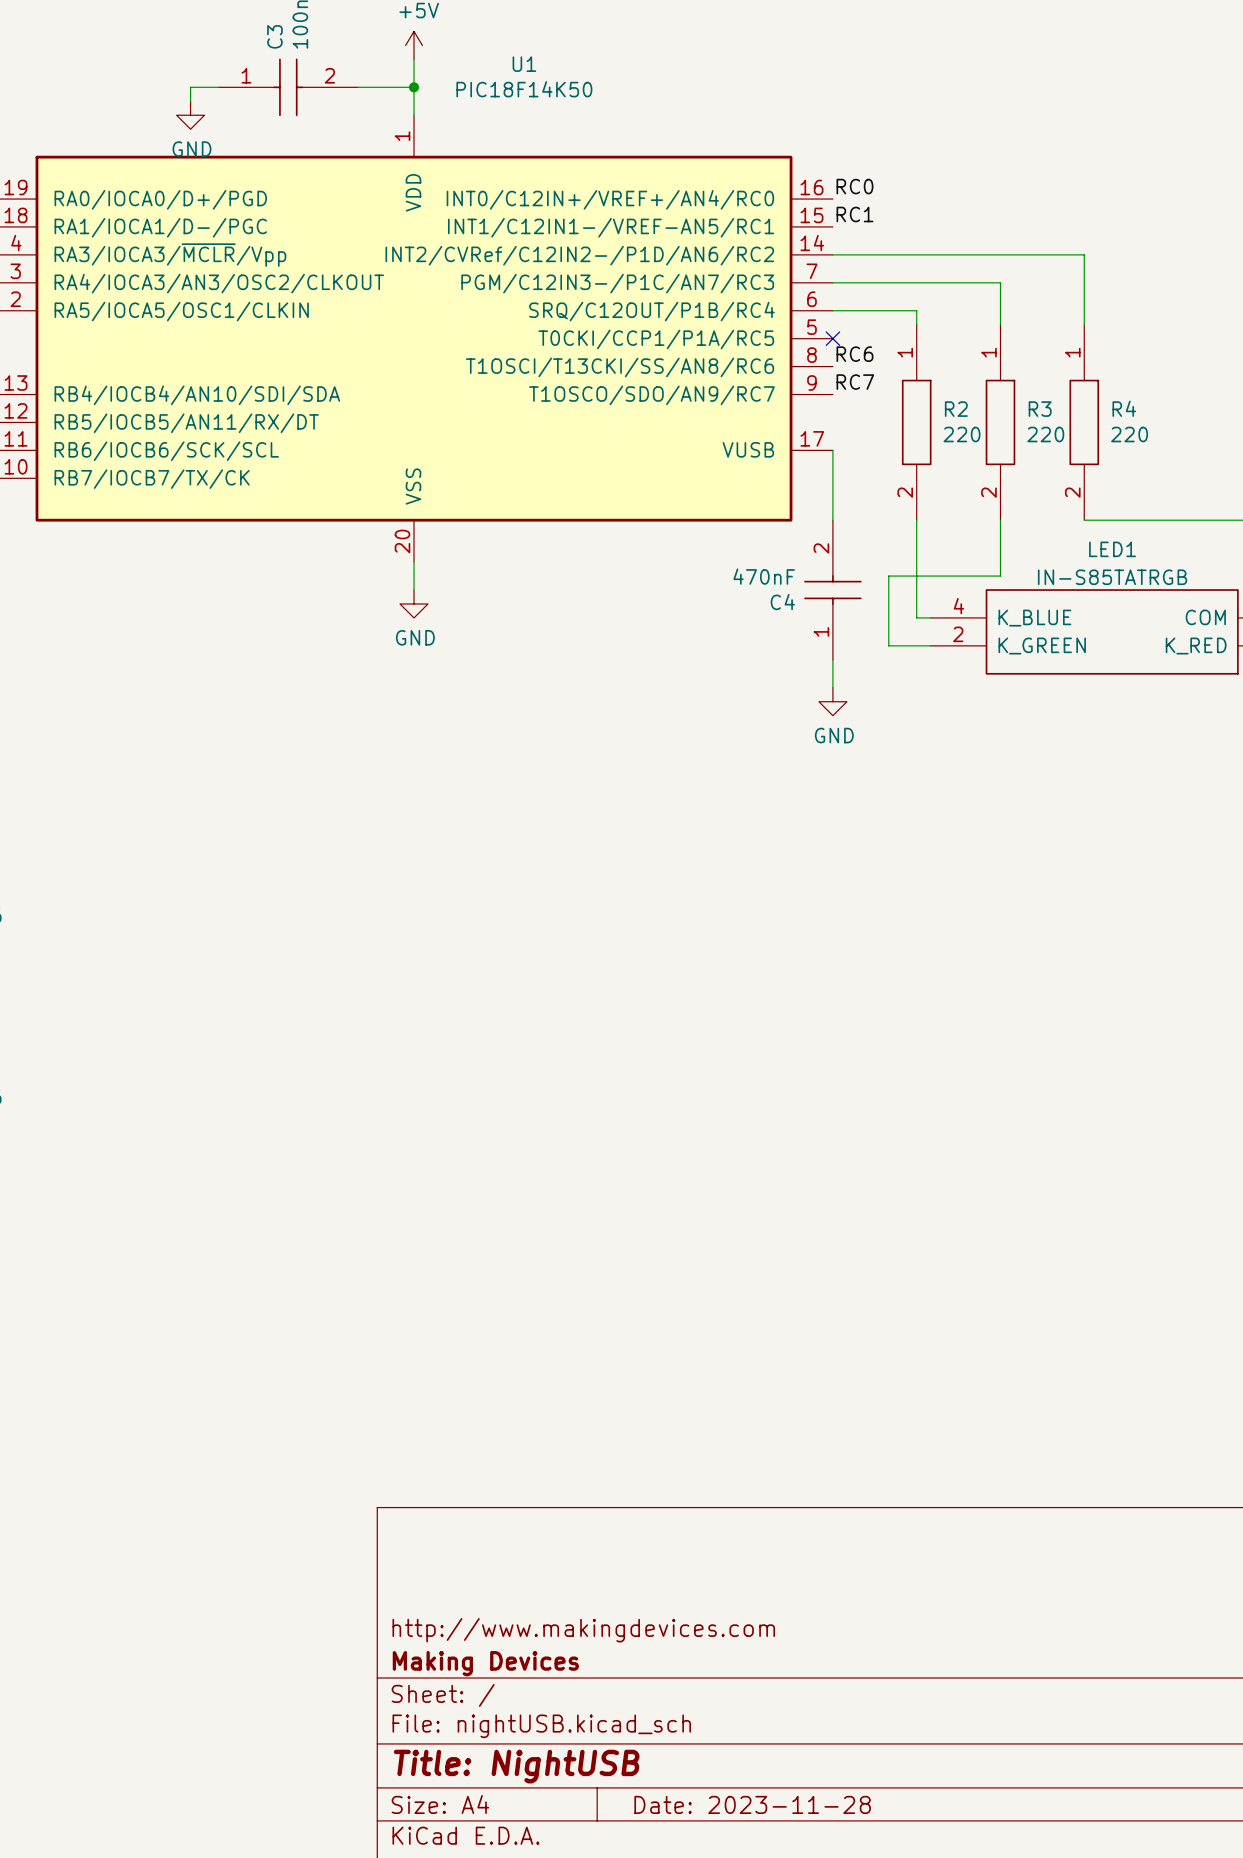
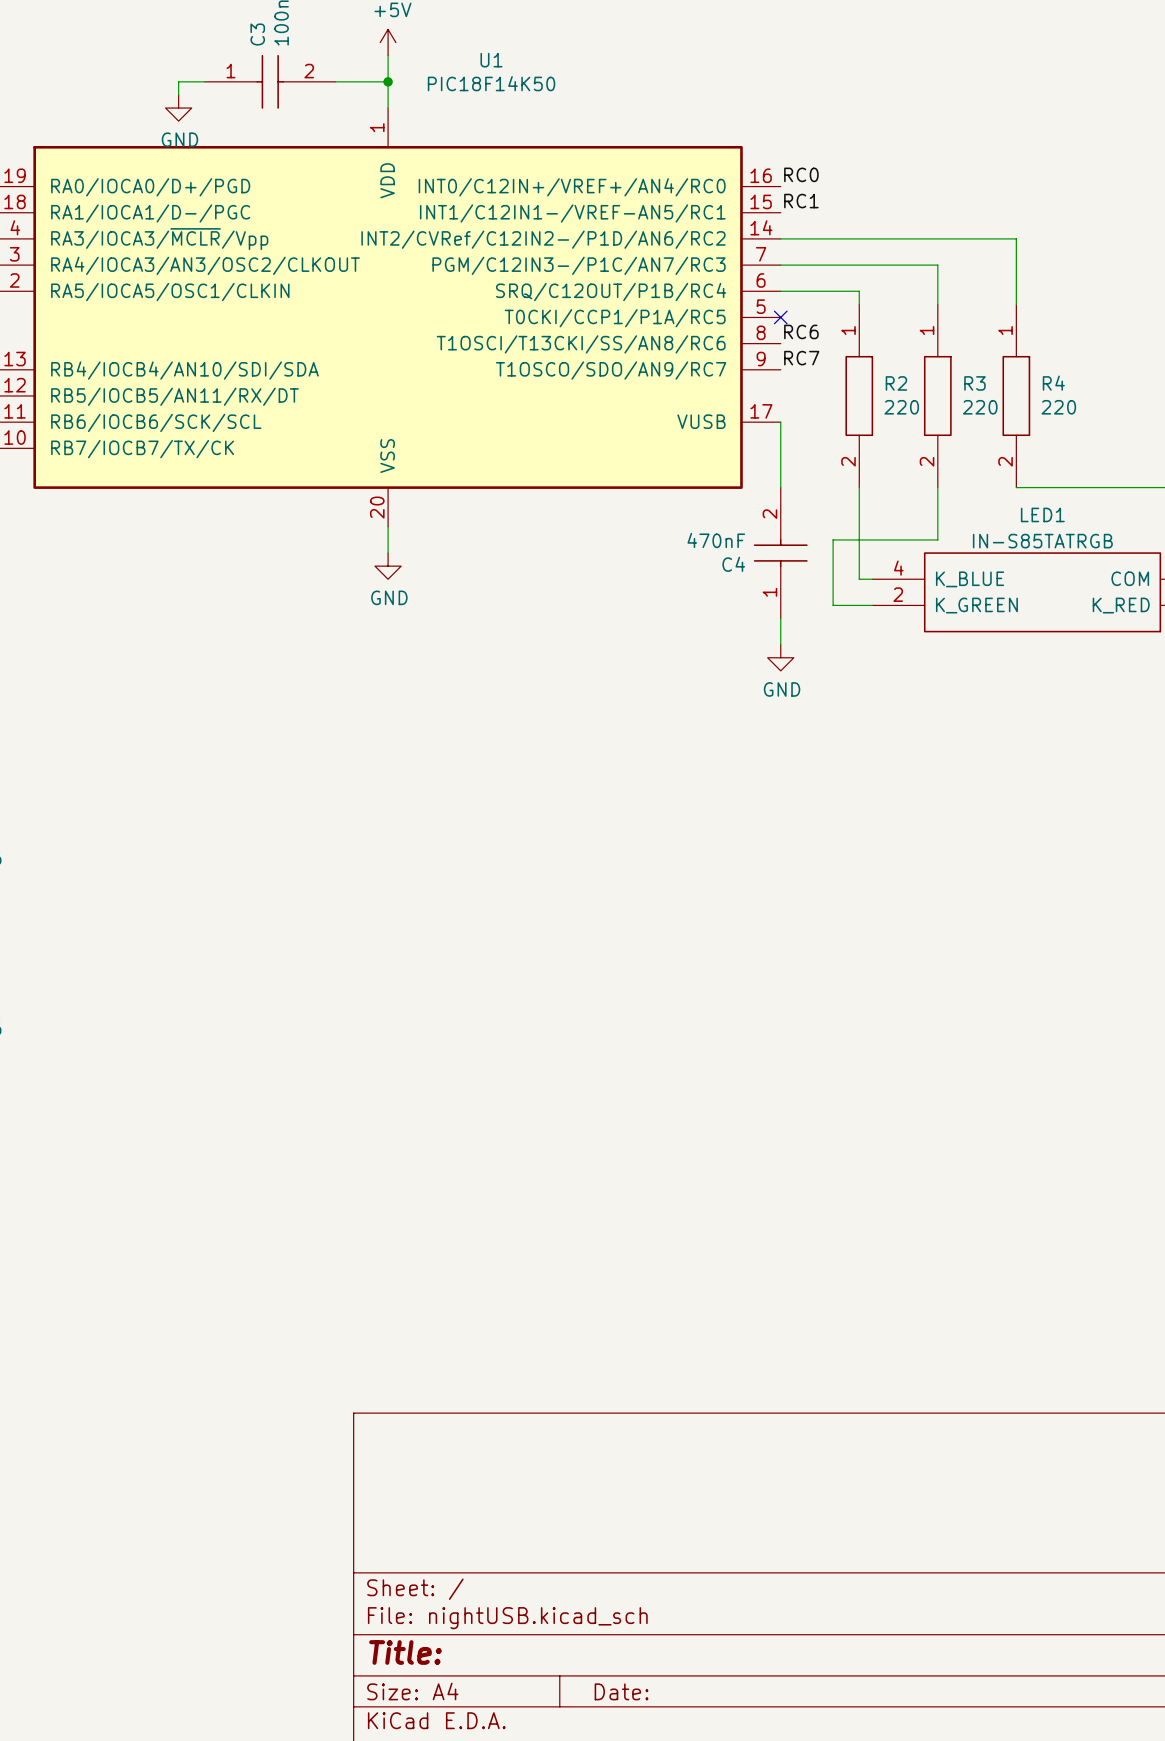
title block: http://www.makingdevices.com (583, 1630) -> none
title block: Making Devices (485, 1663) -> none
title block: Title: NightUSB (516, 1766) -> Title: (405, 1652)
title block: Date: 2023-11-28 (752, 1804) -> Date: (621, 1691)

